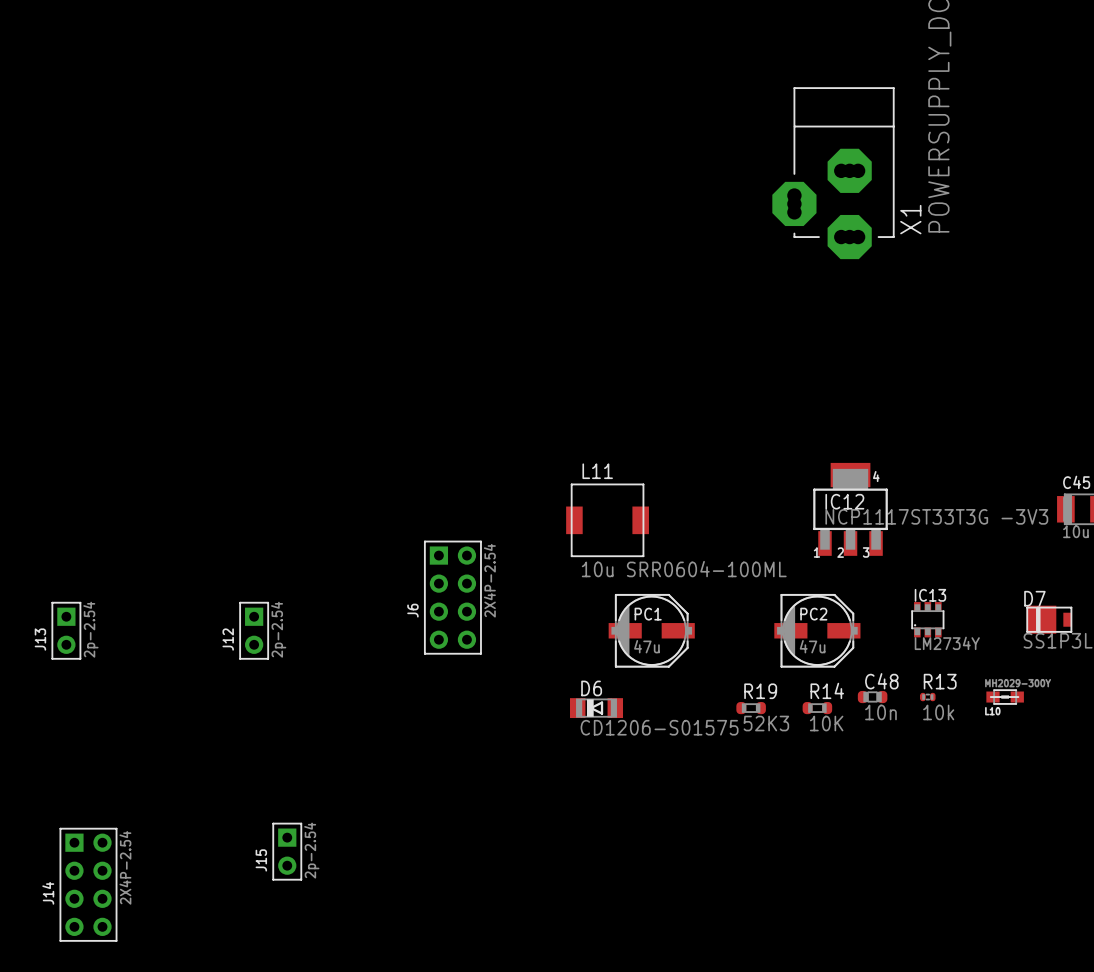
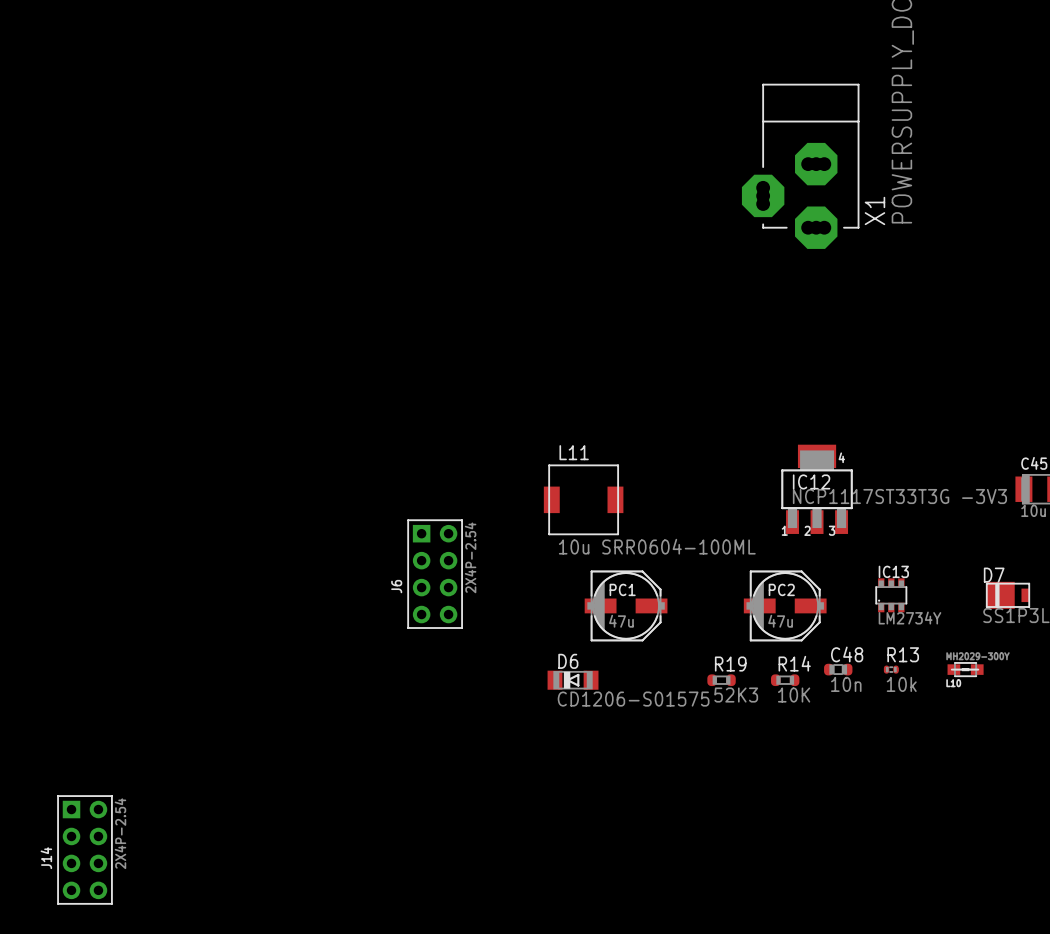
J13: 2p-2.54 (66, 630) -> none
J12: 2p-2.54 (254, 630) -> none
J15: 2p-2.54 (287, 851) -> none

